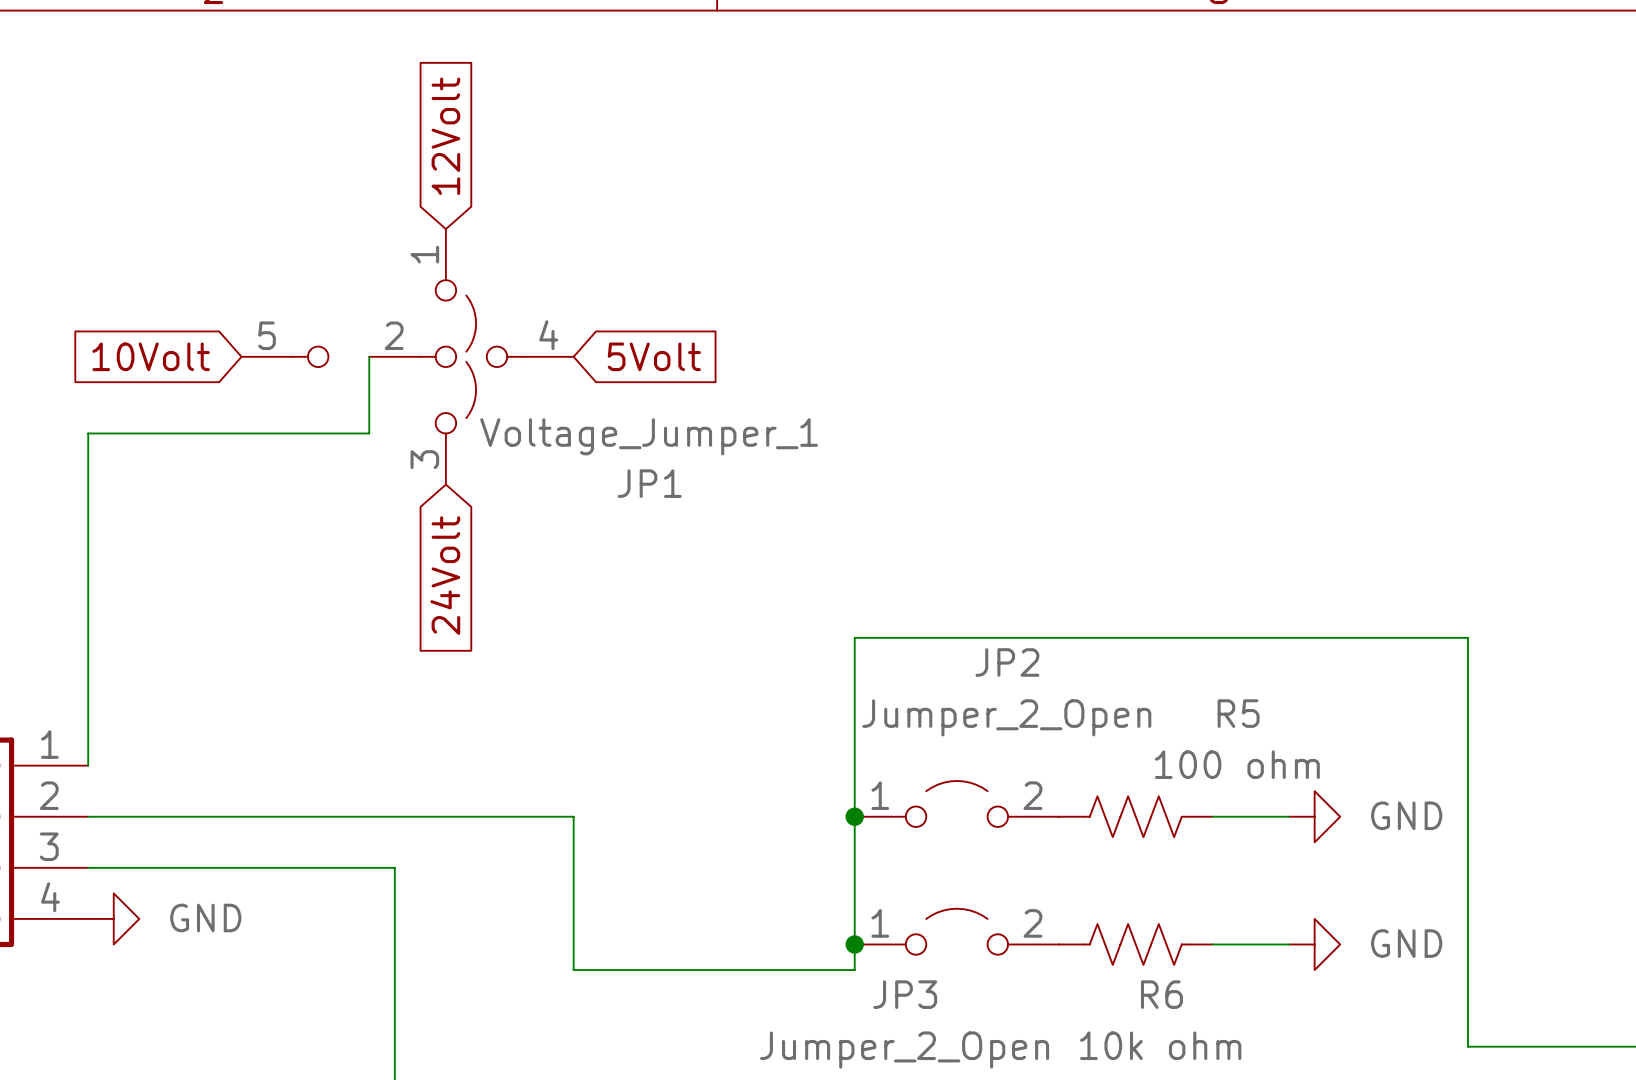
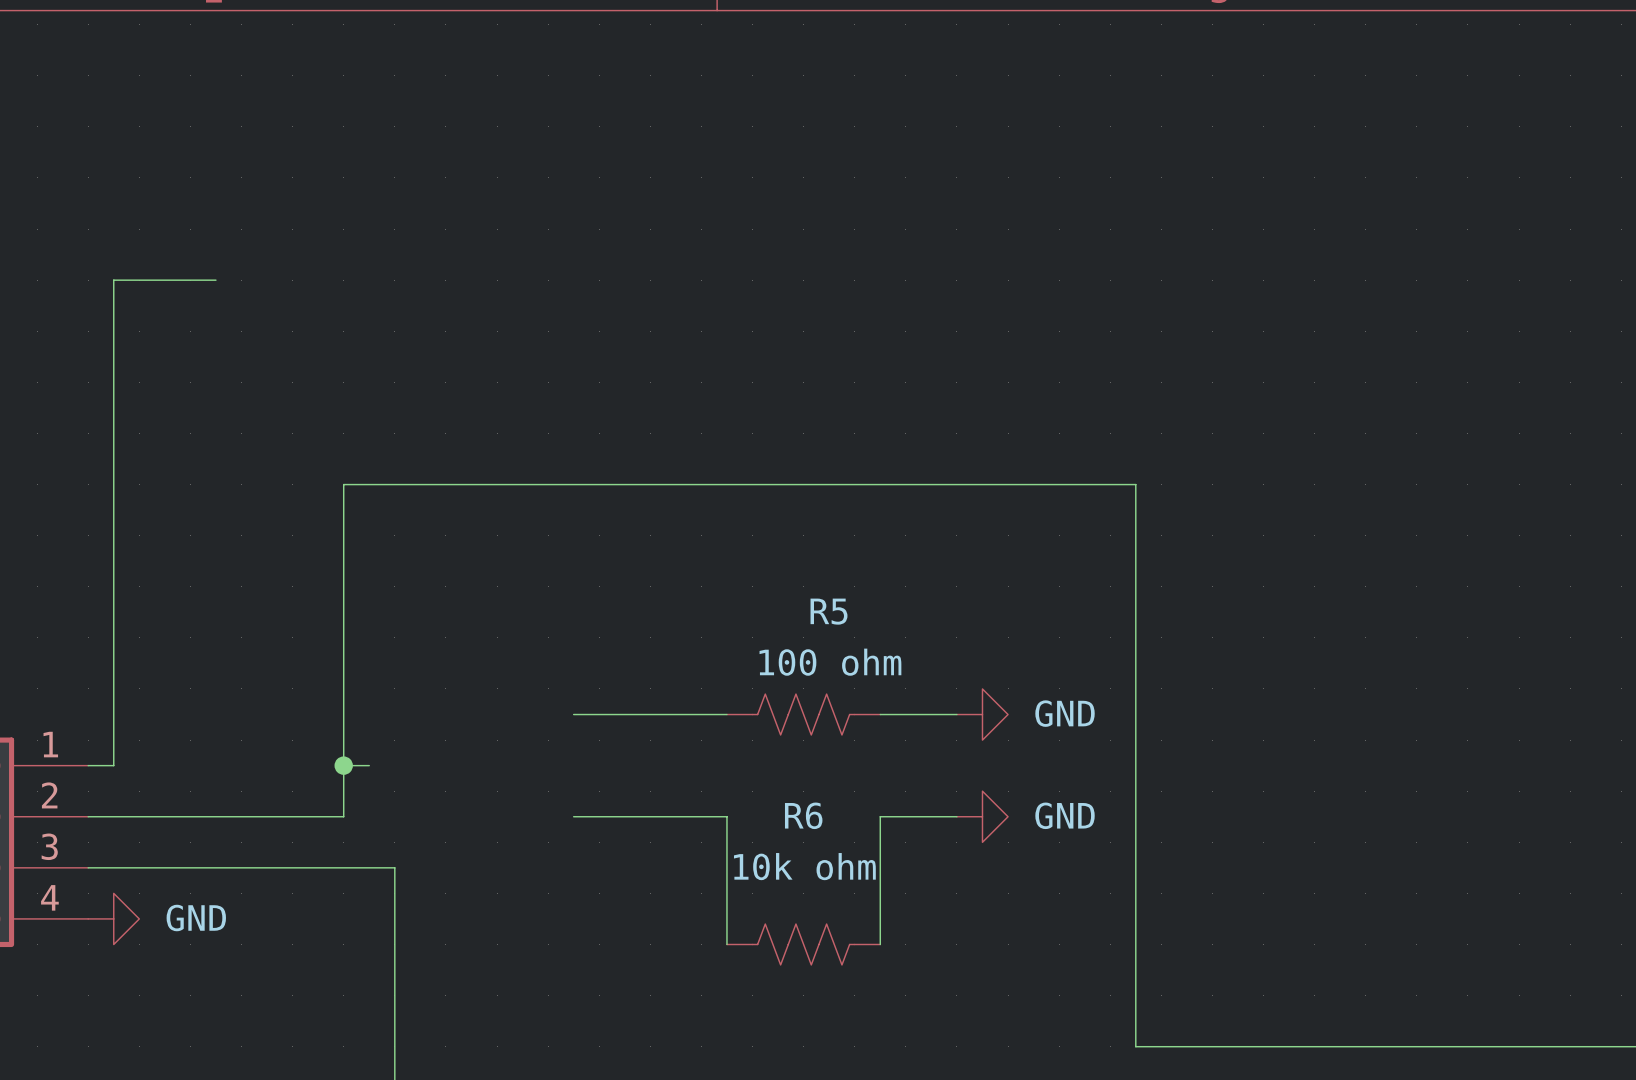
global label: 12Volt (445, 136) -> none
global label: 10Volt (151, 356) -> none
wire: (369, 356) (369, 433) (88, 433) (88, 765) -> (215, 280) (113, 280) (113, 765) (88, 765)
JP1: Voltage_Jumper_1 (407, 356) -> none
global label: 5Volt (654, 356) -> none
global label: 24Volt (445, 575) -> none
R5 name position: R5 (1238, 713) -> R5 (829, 611)
wire: none -> (573, 714) (726, 714)
power symbol: none -> GND (982, 714)
R5 value position: 100 ohm (1237, 764) -> 100 ohm (830, 662)
wire: none -> (343, 765) (369, 765)
junction: none -> (343, 765)
JP2: Jumper_2_Open (956, 803) -> none
wire: (343, 816) (573, 816) (573, 970) (854, 970) (854, 637) (1467, 637) (1467, 1046) -> (343, 816) (343, 484) (1135, 484) (1135, 1046) (1467, 1046)
wire: none -> (573, 816) (726, 816) (726, 944)
junction: (854, 816) -> none
wire: none -> (956, 816) (880, 816) (880, 944)
power symbol: none -> GND (982, 816)
R5 position: (1135, 816) -> (803, 714)
wire: (1212, 816) (1289, 816) -> (880, 714) (956, 714)
power symbol: GND (1314, 816) -> none
JP3: Jumper_2_Open (956, 931) -> none
junction: (854, 944) -> none
R6 position: (1135, 944) -> (803, 944)
wire: (1212, 944) (1289, 944) -> none
power symbol: GND (1314, 944) -> none
R6 name position: R6 (1161, 994) -> R6 (803, 815)
R6 value position: 10k ohm (1160, 1045) -> 10k ohm (804, 866)

